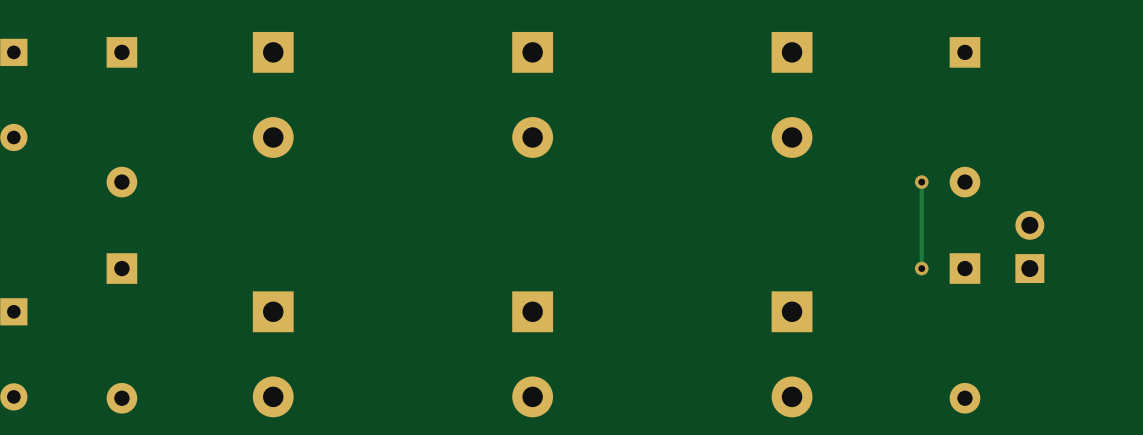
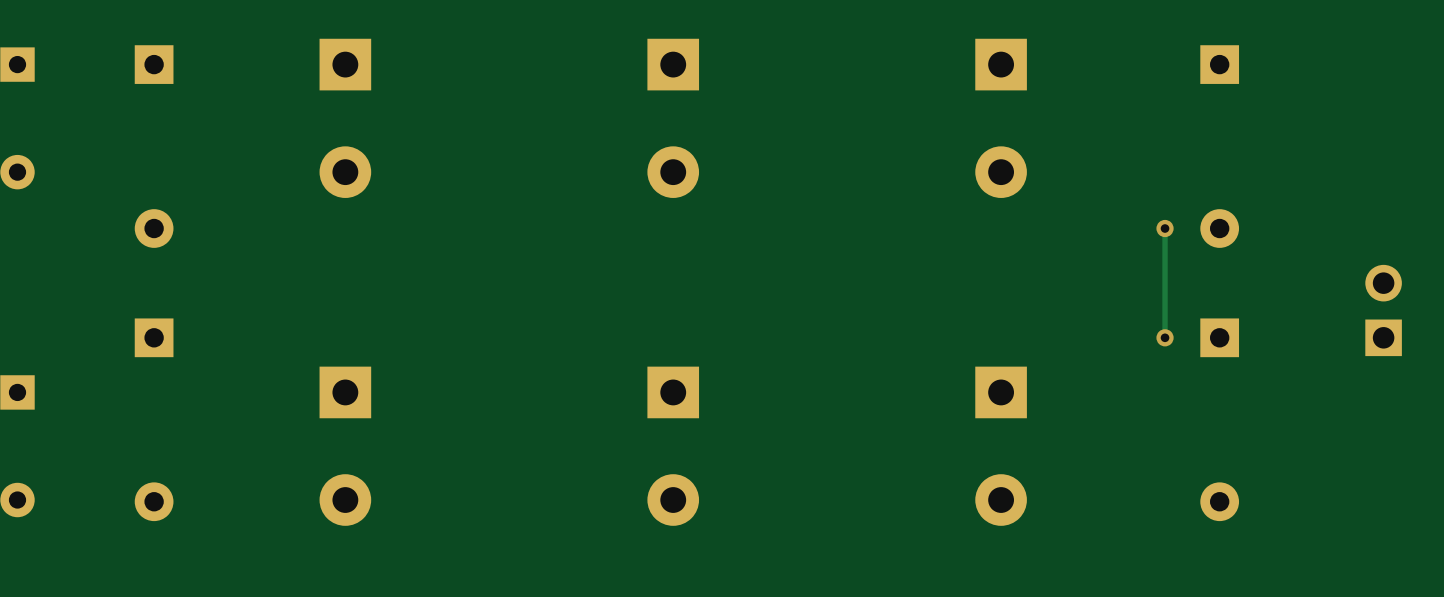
part position: (1029, 246) -> (1383, 310)

